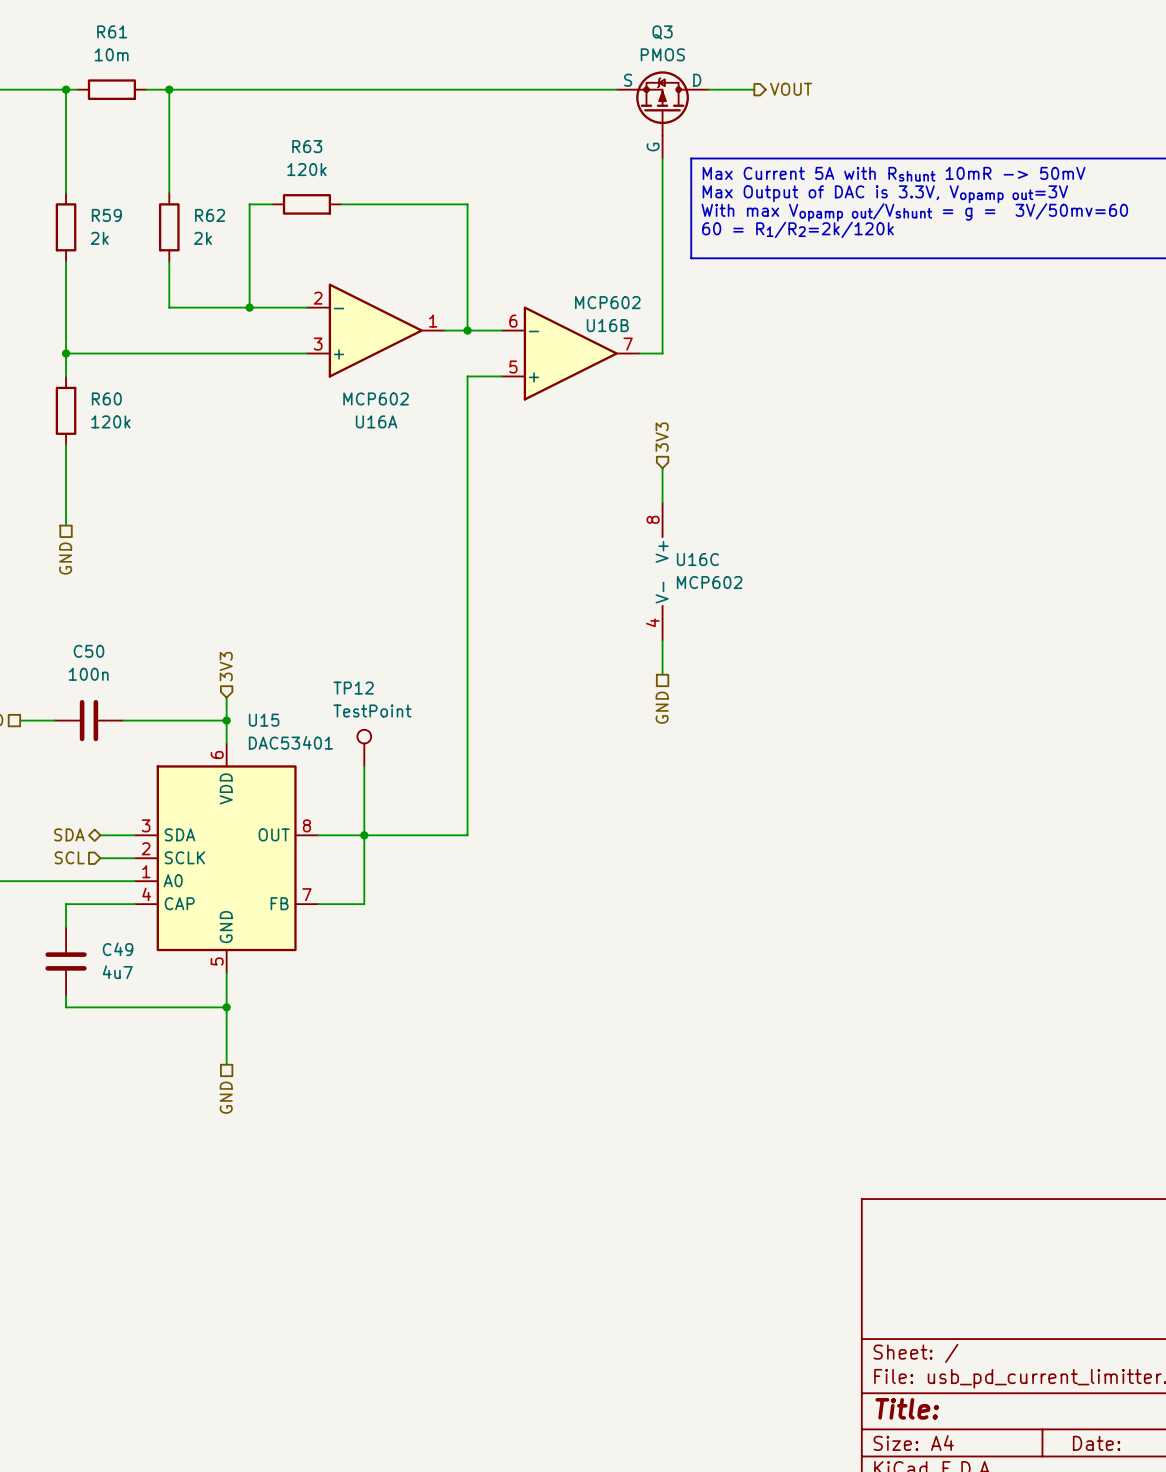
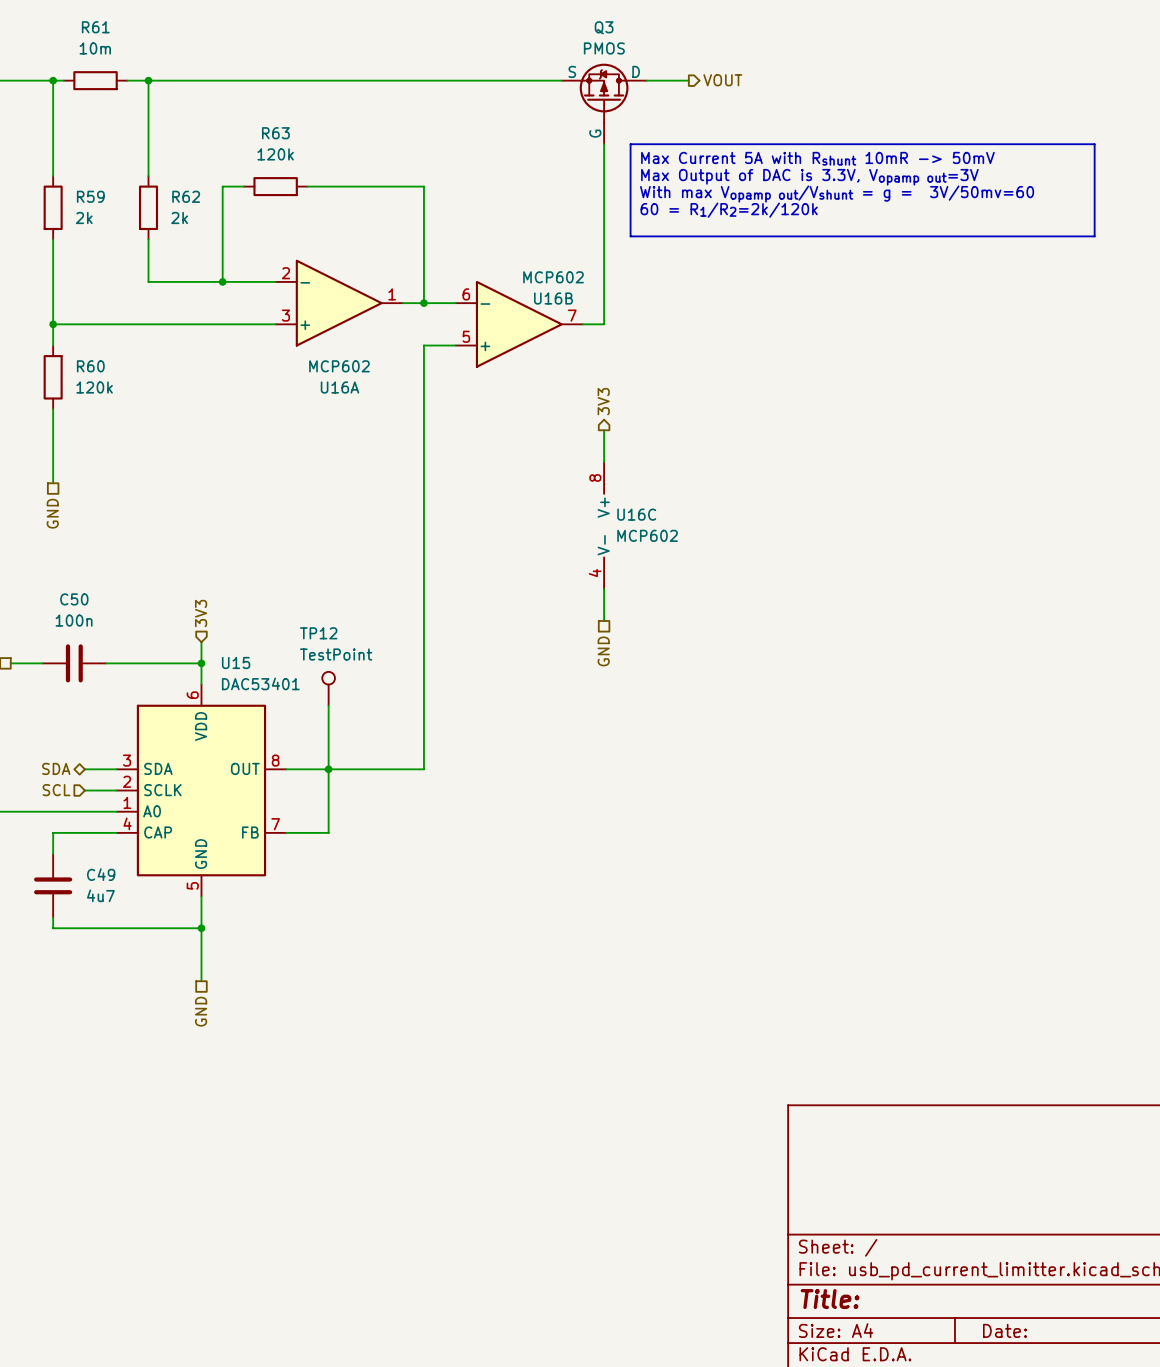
hierarchical label shape: input (662, 437) -> output (603, 401)

